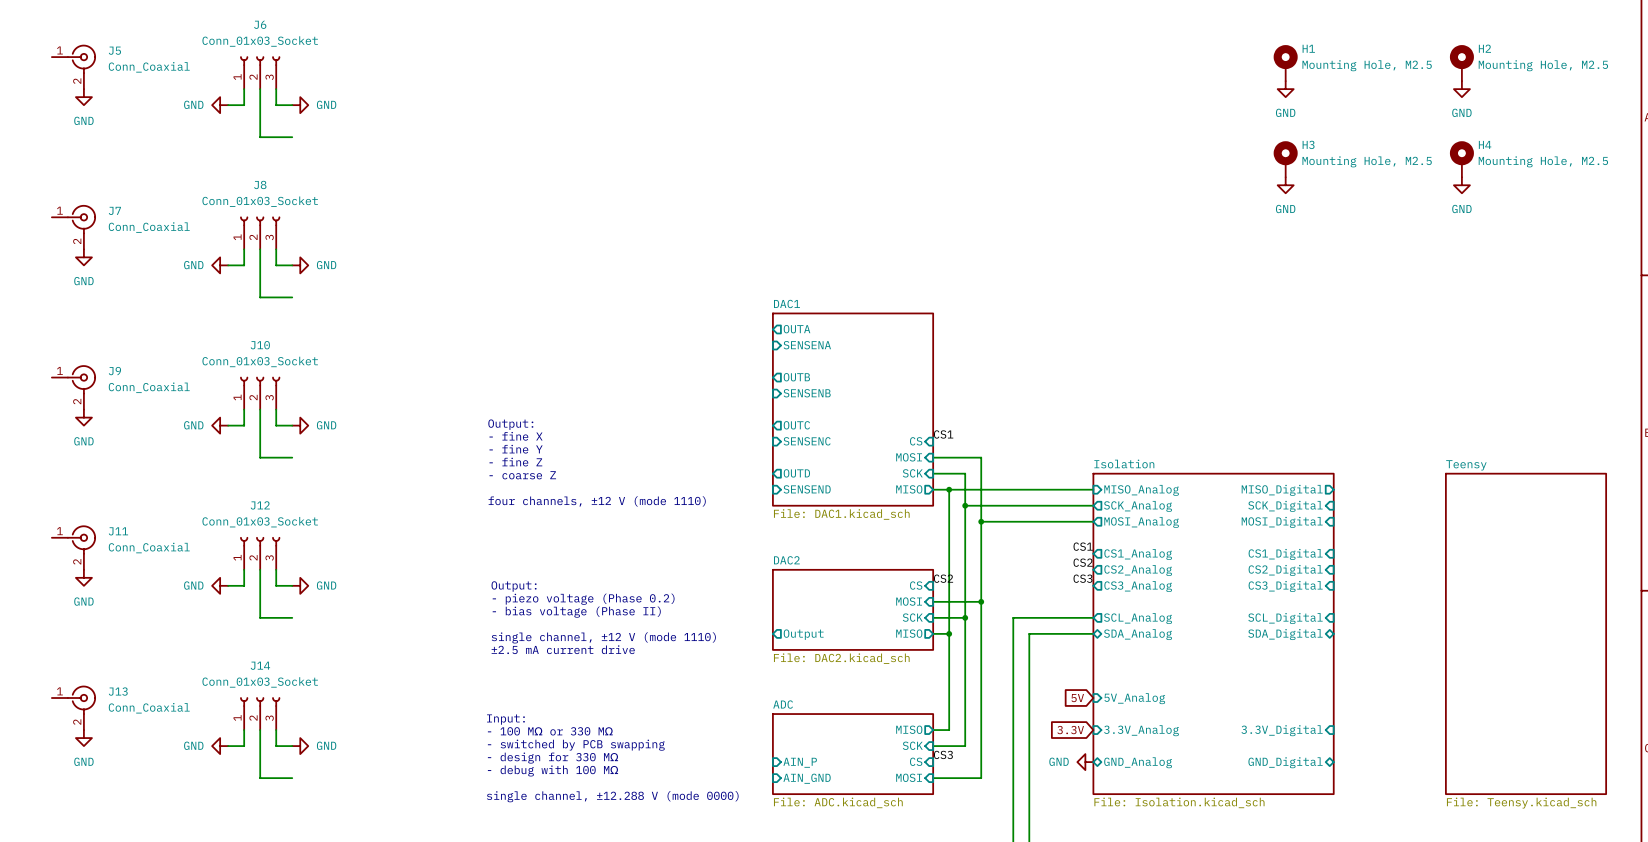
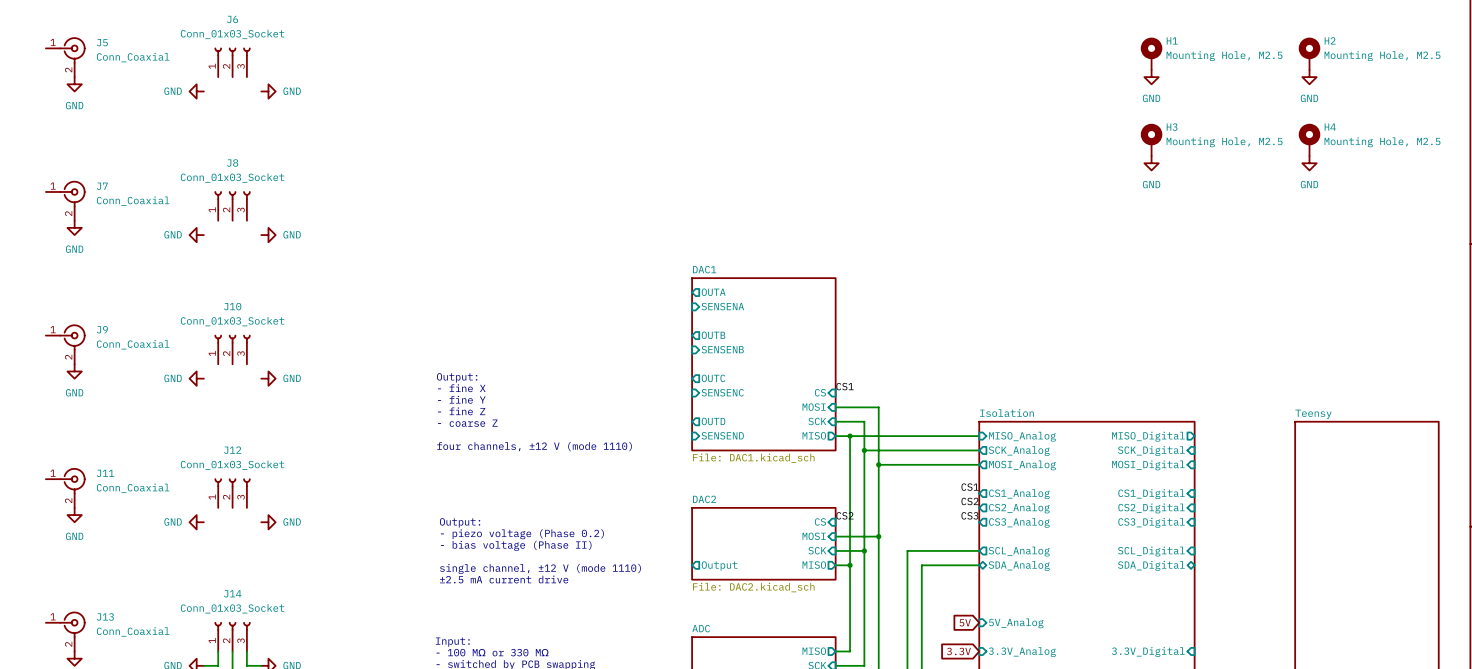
wire: (244, 89) (244, 105) (228, 105) -> none
wire: (260, 89) (260, 137) (292, 137) -> none
wire: (276, 89) (276, 105) (292, 105) -> none
wire: (244, 249) (244, 265) (228, 265) -> none
wire: (260, 249) (260, 297) (292, 297) -> none
wire: (276, 249) (276, 265) (292, 265) -> none
wire: (244, 409) (244, 425) (228, 425) -> none
wire: (260, 409) (260, 457) (292, 457) -> none
wire: (276, 409) (276, 425) (292, 425) -> none
wire: (244, 569) (244, 585) (228, 585) -> none
wire: (260, 569) (260, 617) (292, 617) -> none
wire: (276, 569) (276, 585) (292, 585) -> none

